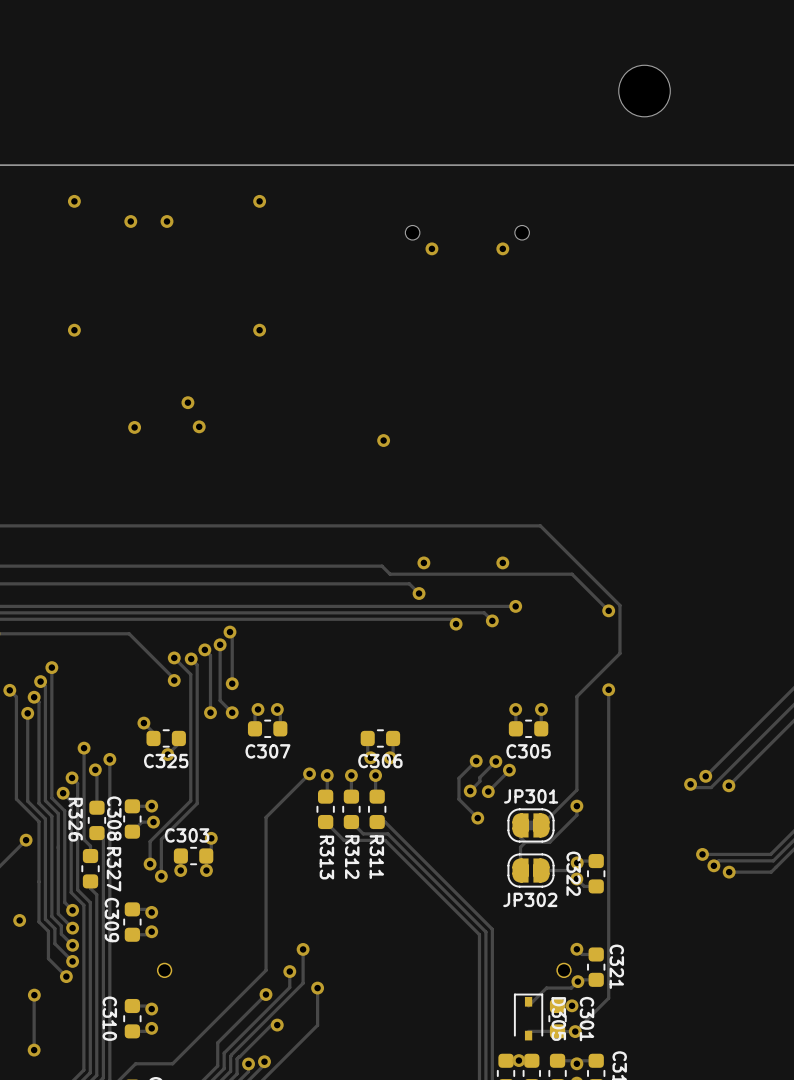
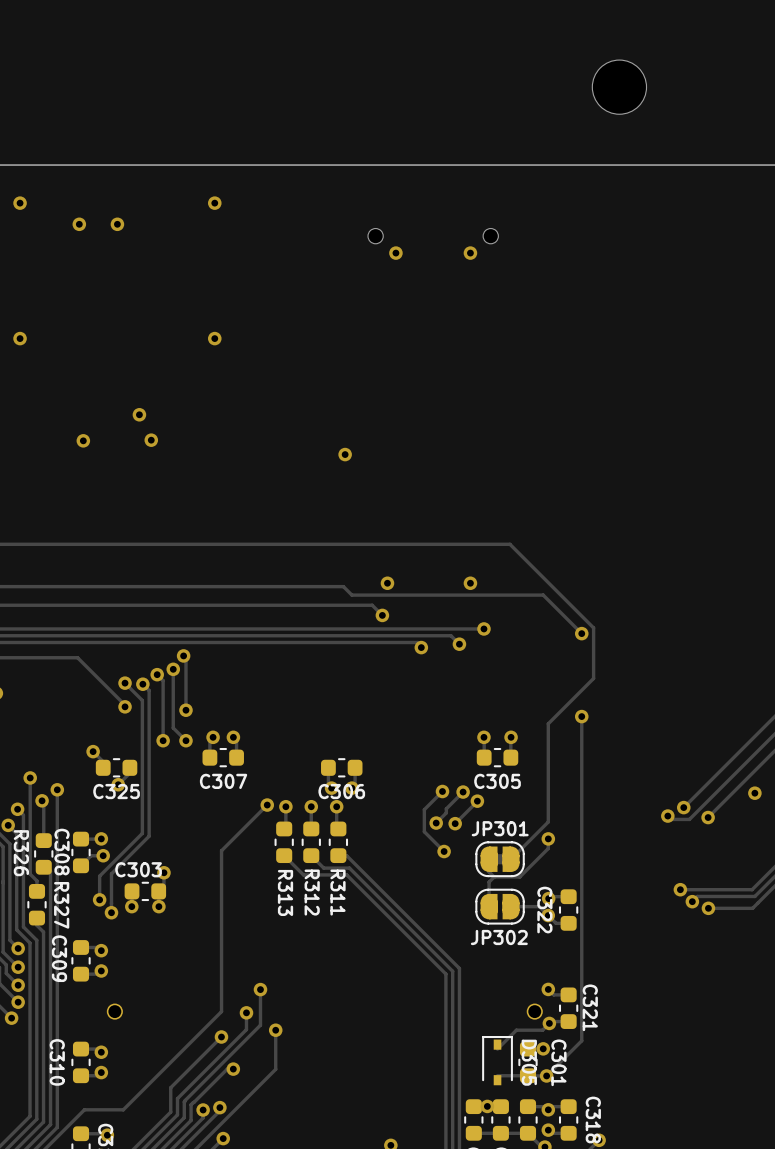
via: none -> (754, 793)

